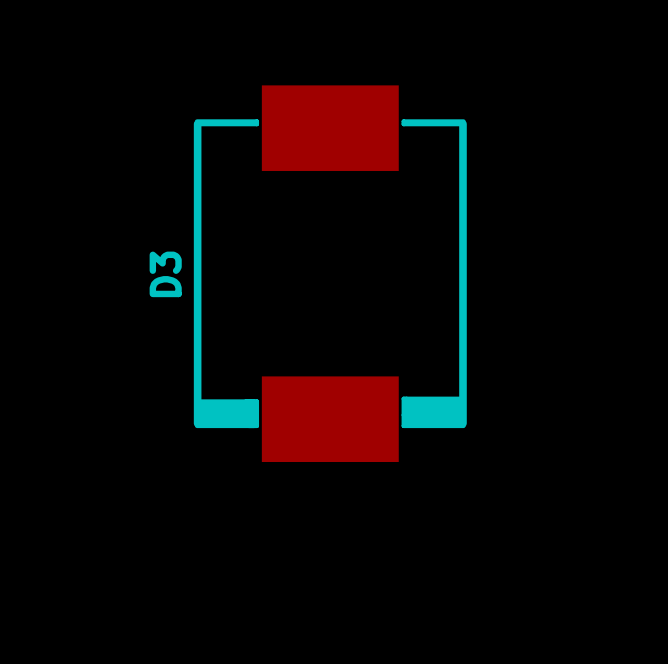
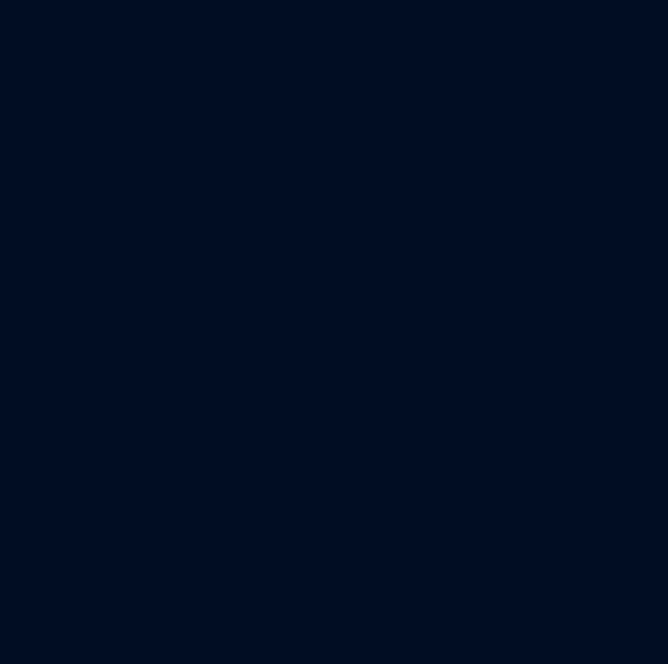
D3: (330, 273) -> none

